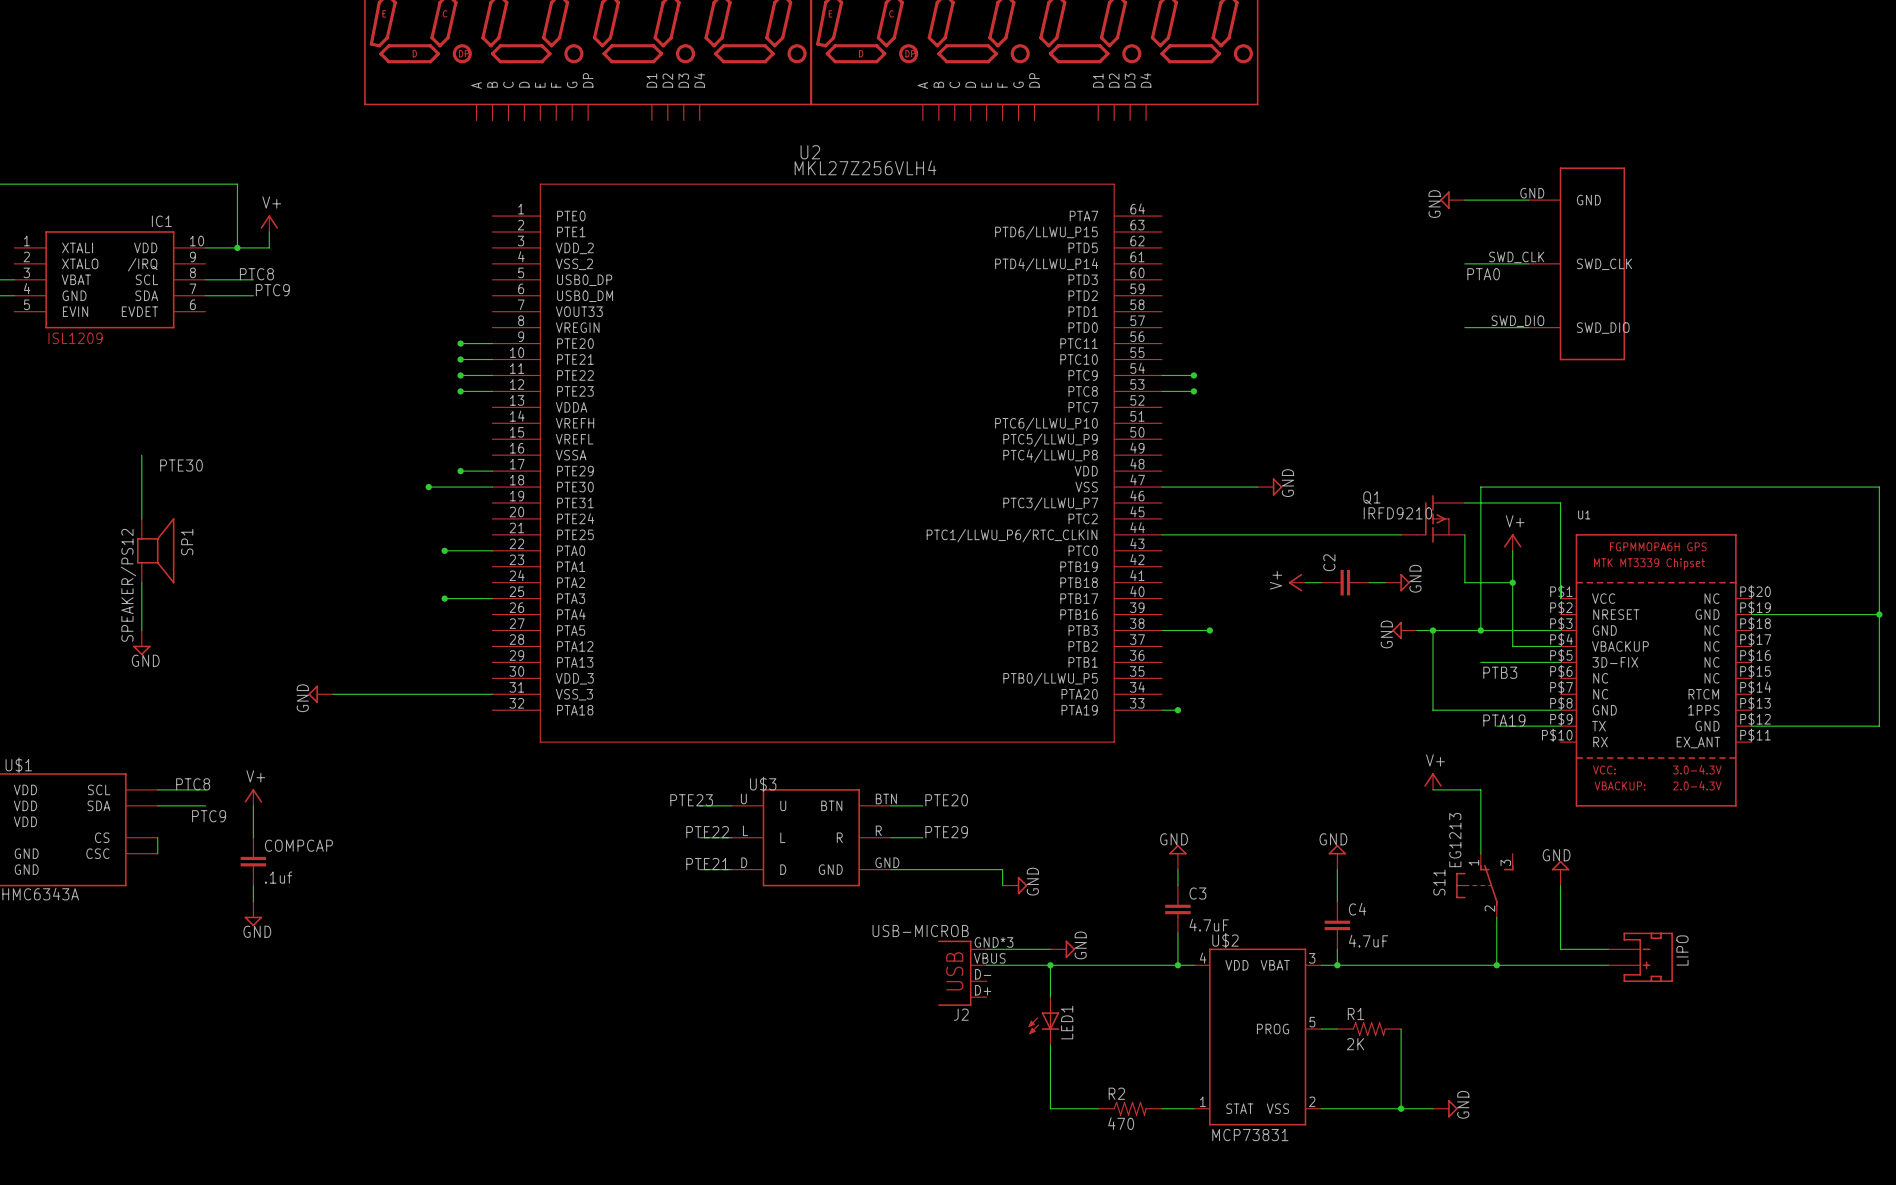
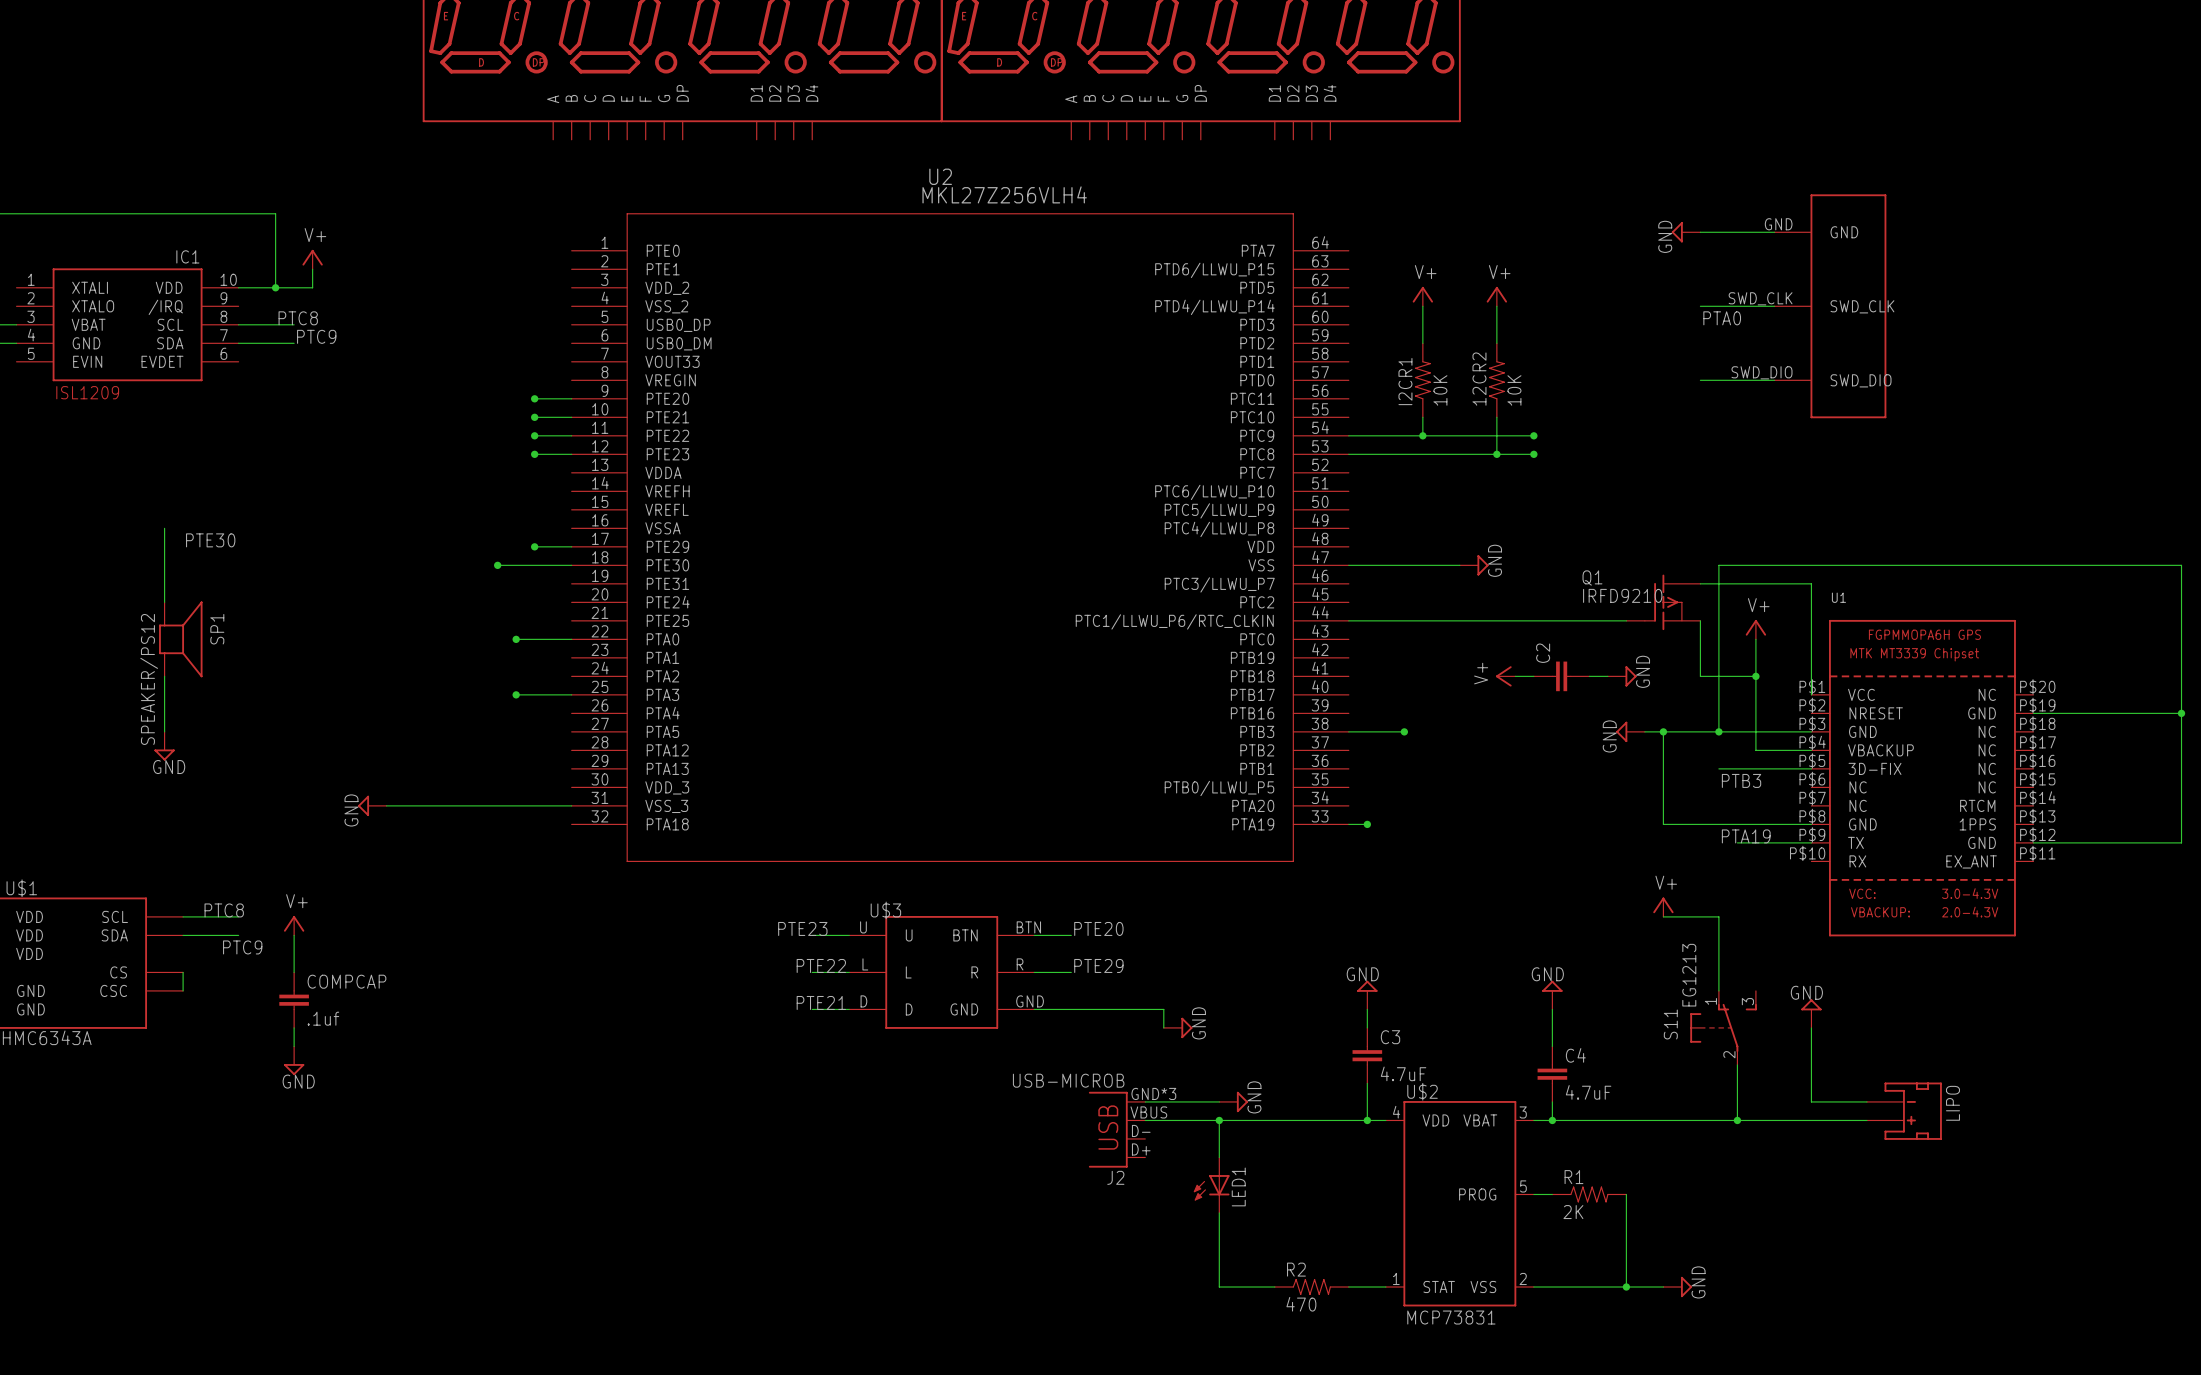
power symbol: none -> V+ (1422, 296)
power symbol: none -> V+ (1496, 296)
wire: none -> (1422, 306) (1422, 343)
wire: none -> (1496, 306) (1496, 343)
I2CR1: none -> 10K (1422, 380)
12CR2: none -> 10K (1496, 380)
wire: none -> (1422, 417) (1422, 435)
wire: none -> (1496, 417) (1496, 454)
wire: none -> (1385, 435) (1533, 435)
junction: (1193, 375) -> none
junction: none -> (1422, 435)
junction: none -> (1533, 435)
wire: none -> (1385, 454) (1533, 454)
junction: (1193, 391) -> none
junction: none -> (1496, 454)
junction: none -> (1533, 454)

